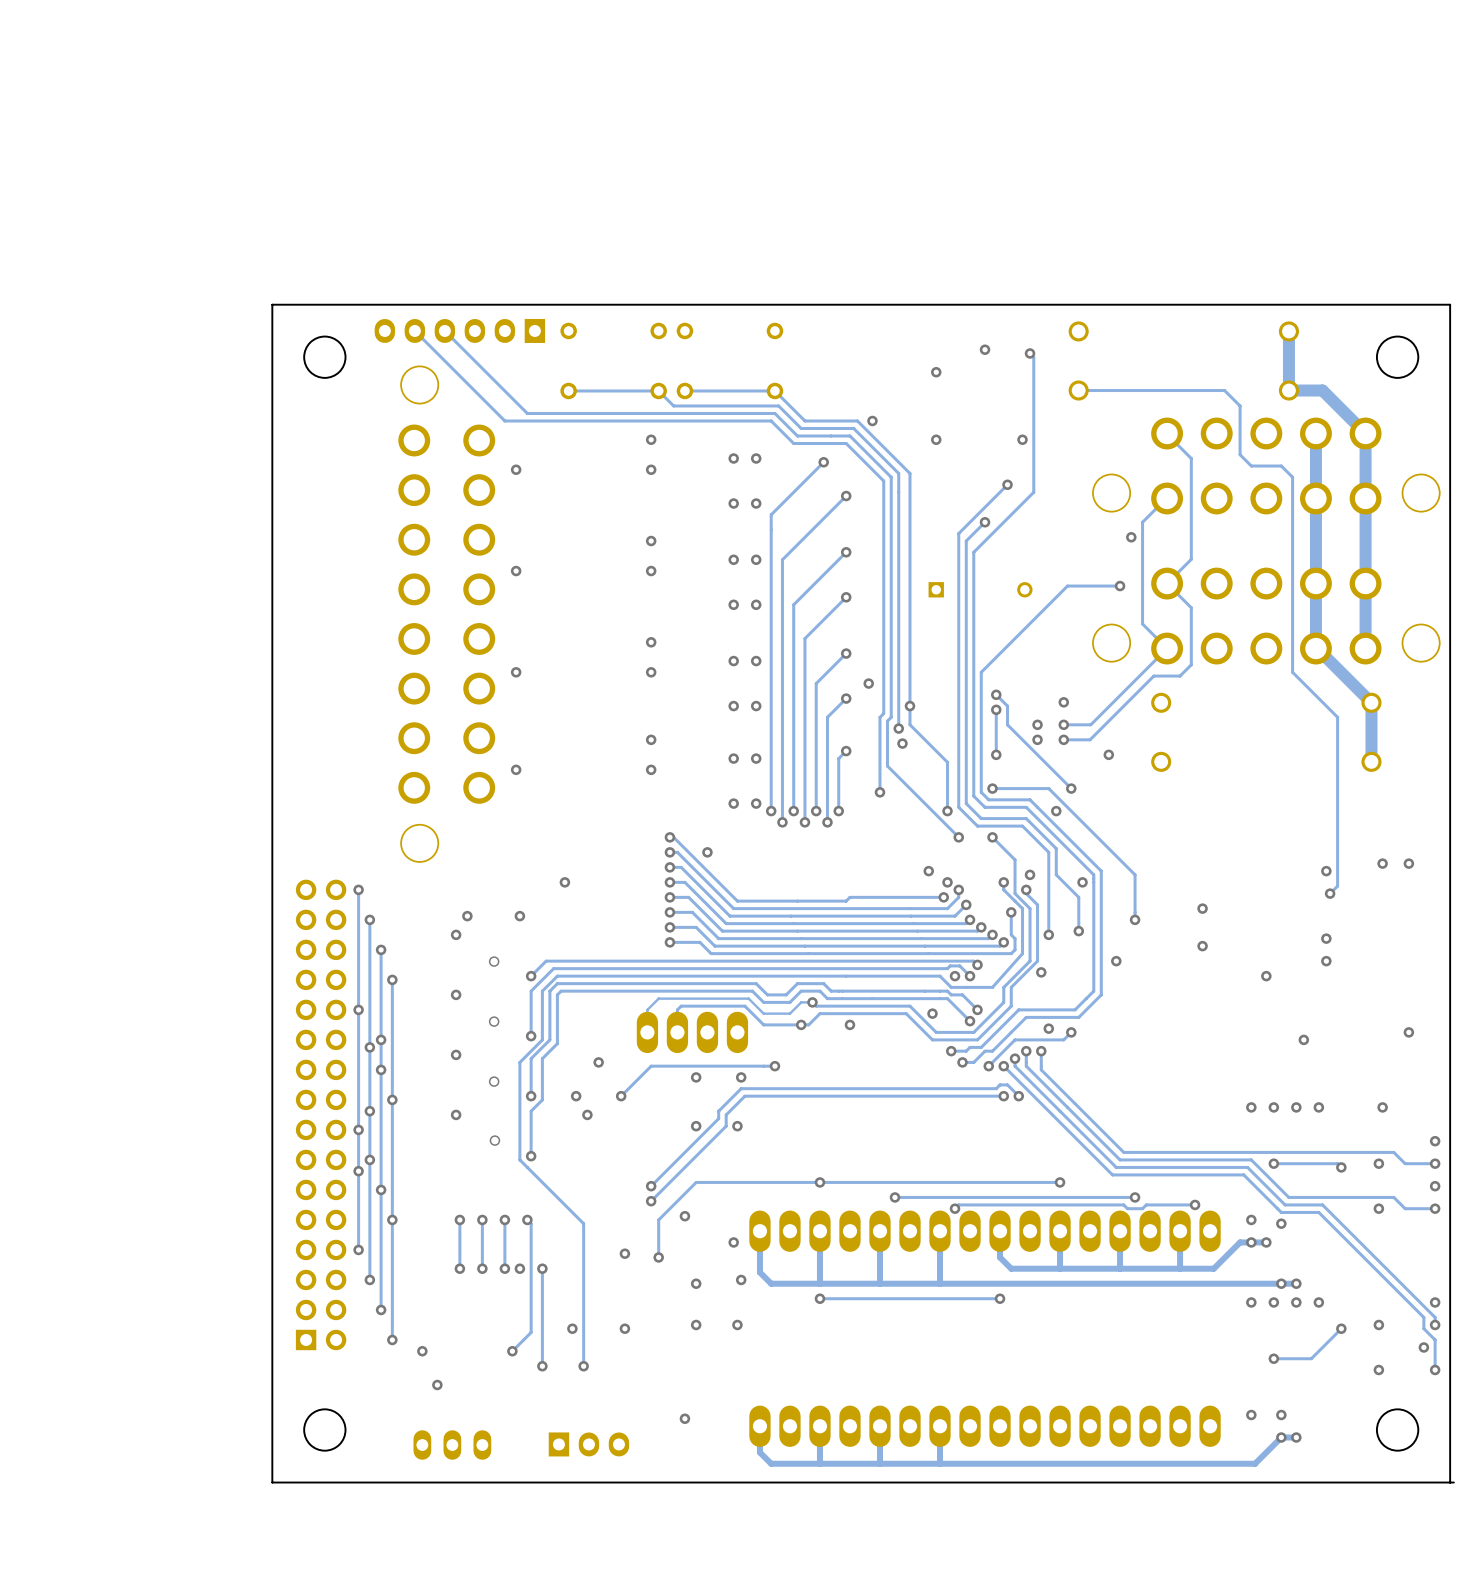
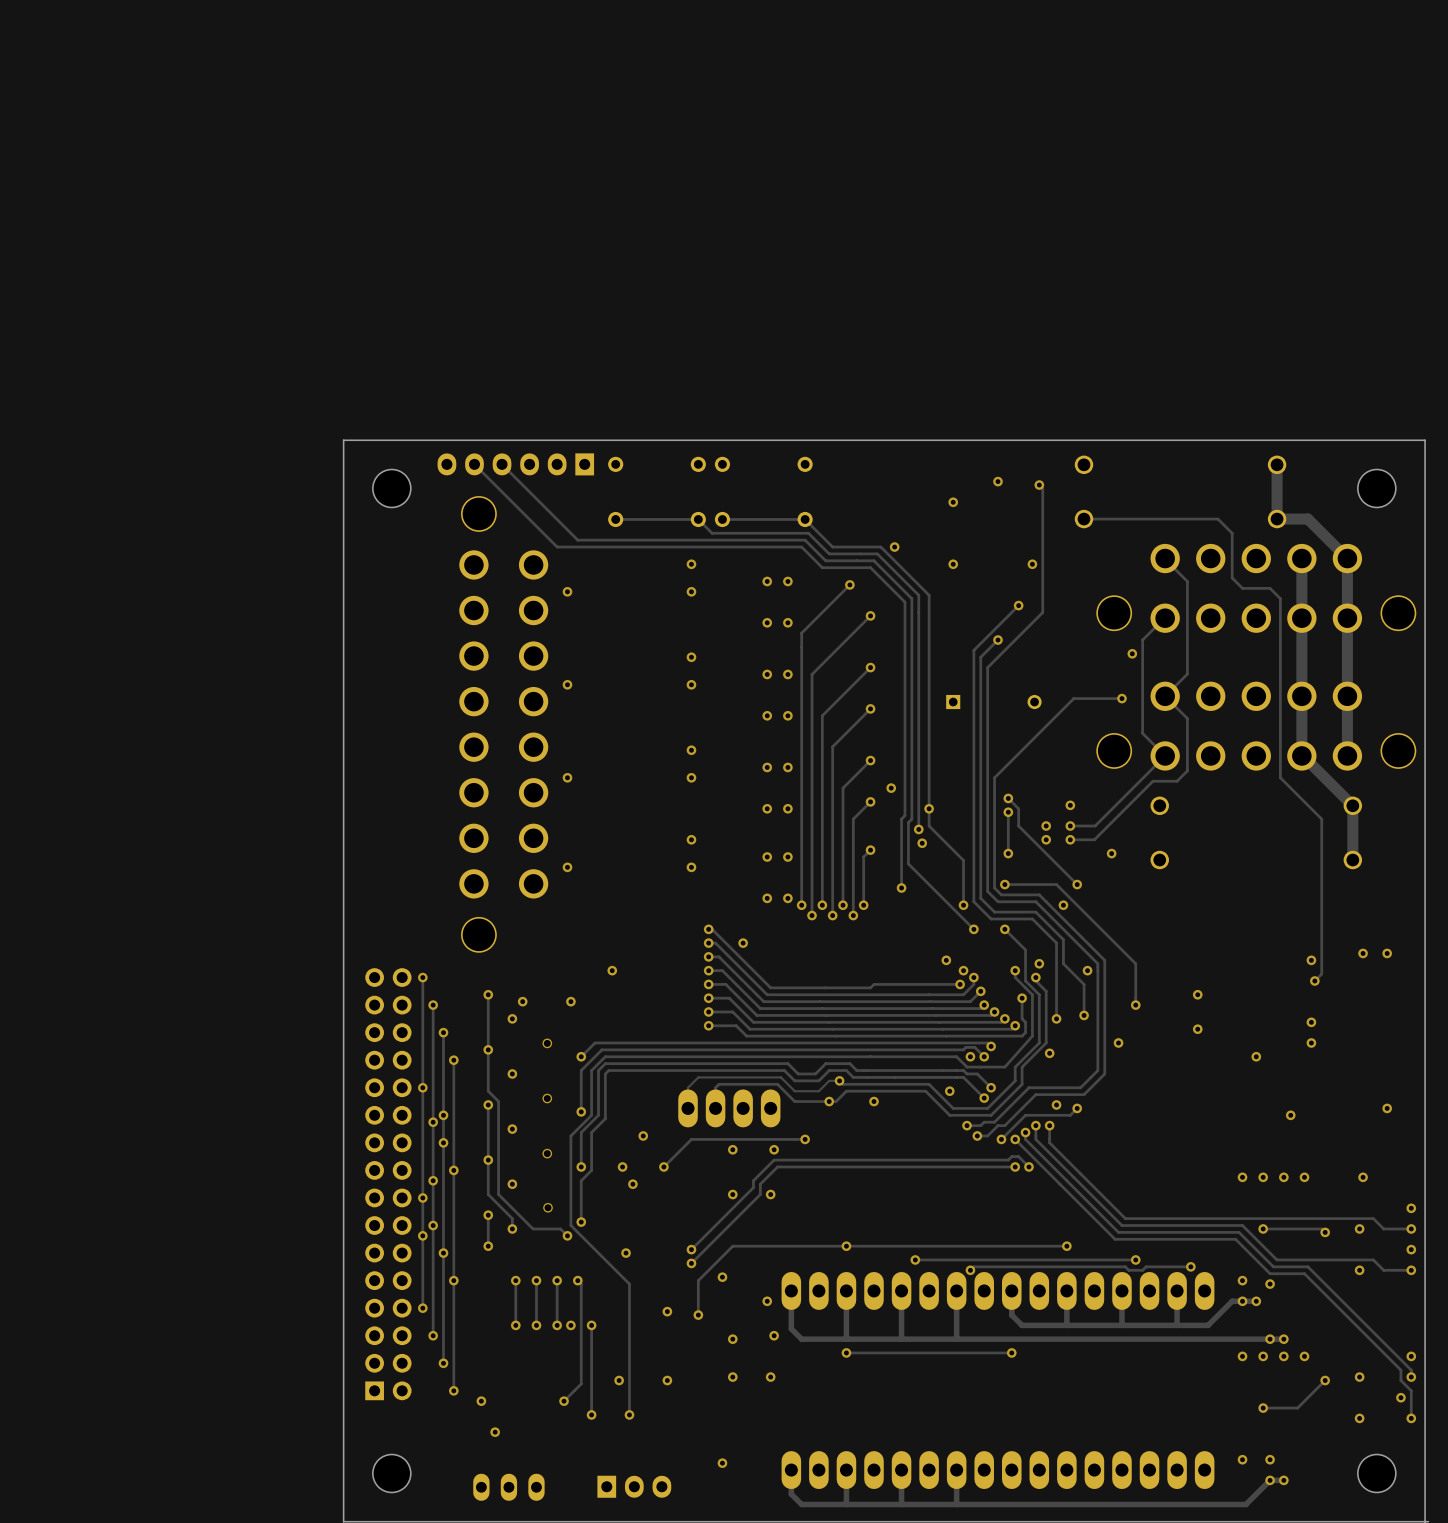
track: none -> (488, 994) (488, 1091) (498, 1101) (498, 1194) (533, 1228) (560, 1228) (567, 1235)
via: none -> (488, 994)
via: none -> (488, 1049)
track: none -> (488, 1104) (488, 1194) (512, 1218) (512, 1228)
via: none -> (488, 1104)
via: none -> (488, 1160)
track: none -> (488, 1215) (488, 1246)
via: none -> (488, 1215)
via: none -> (512, 1228)
via: none -> (567, 1235)
via: none -> (488, 1246)
via: none -> (626, 1253)

